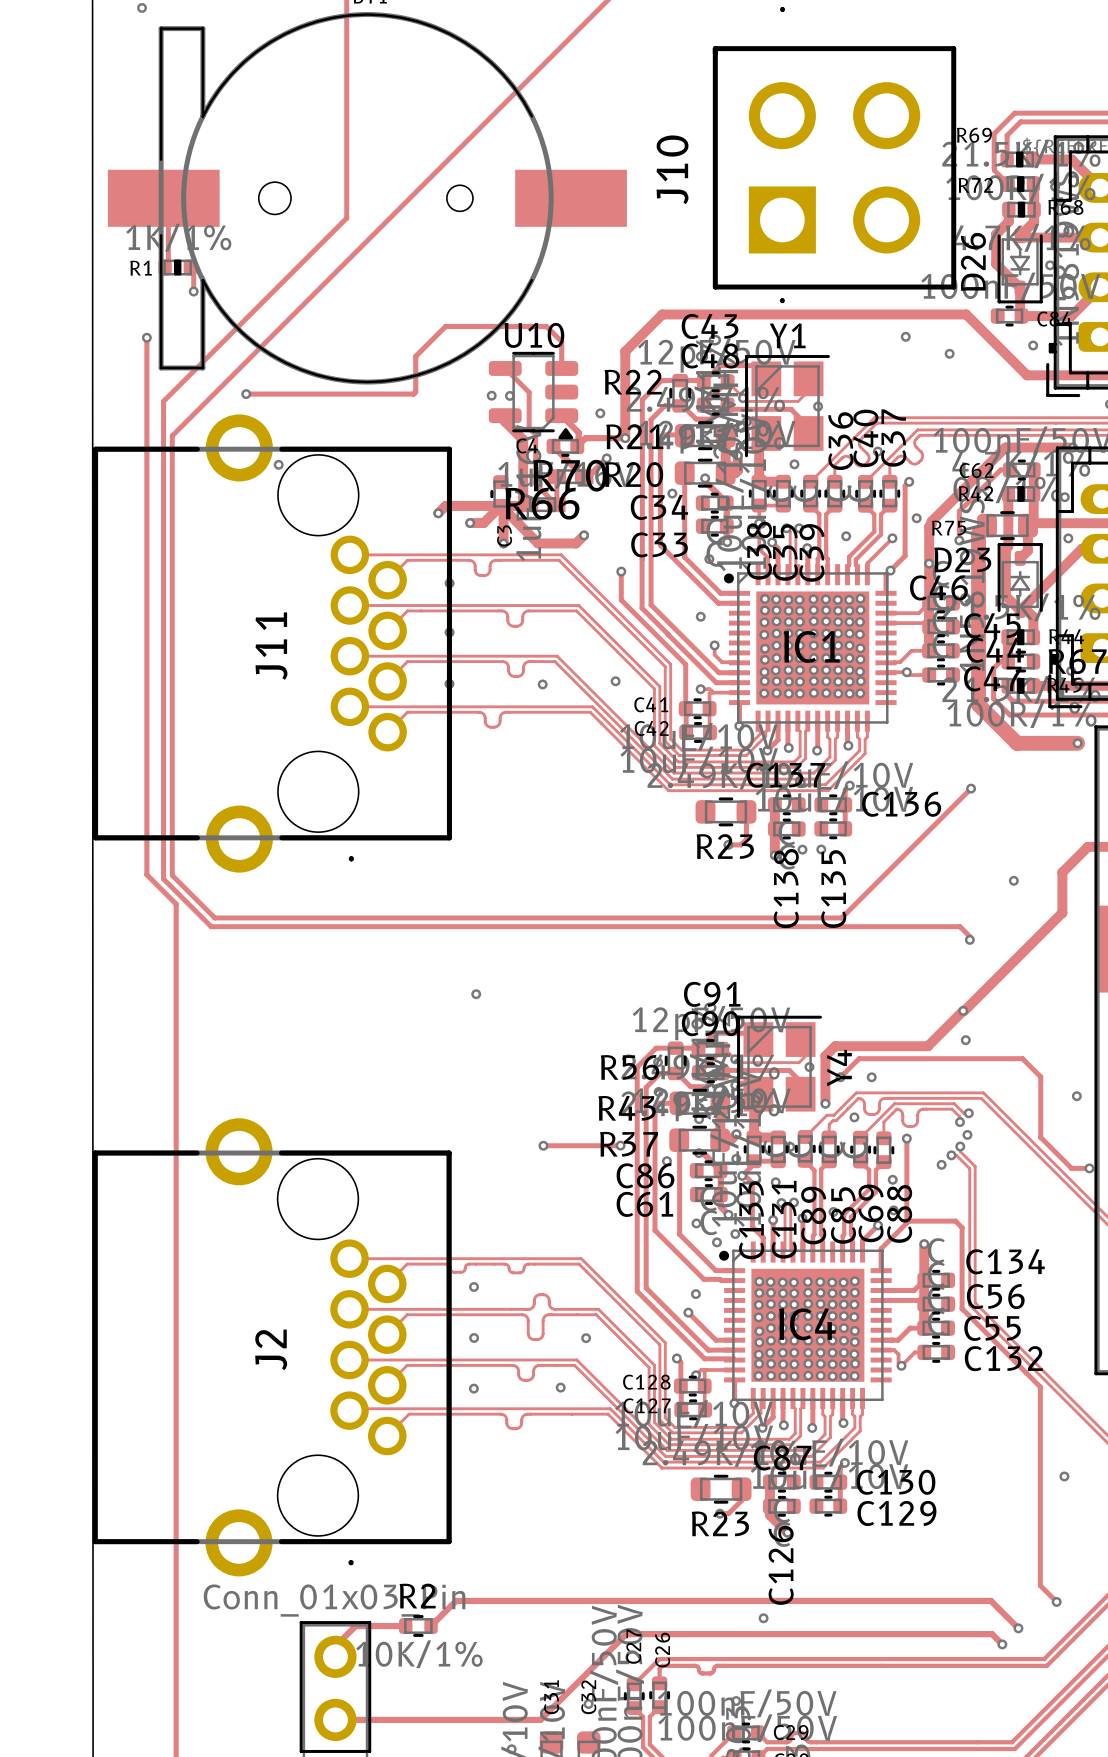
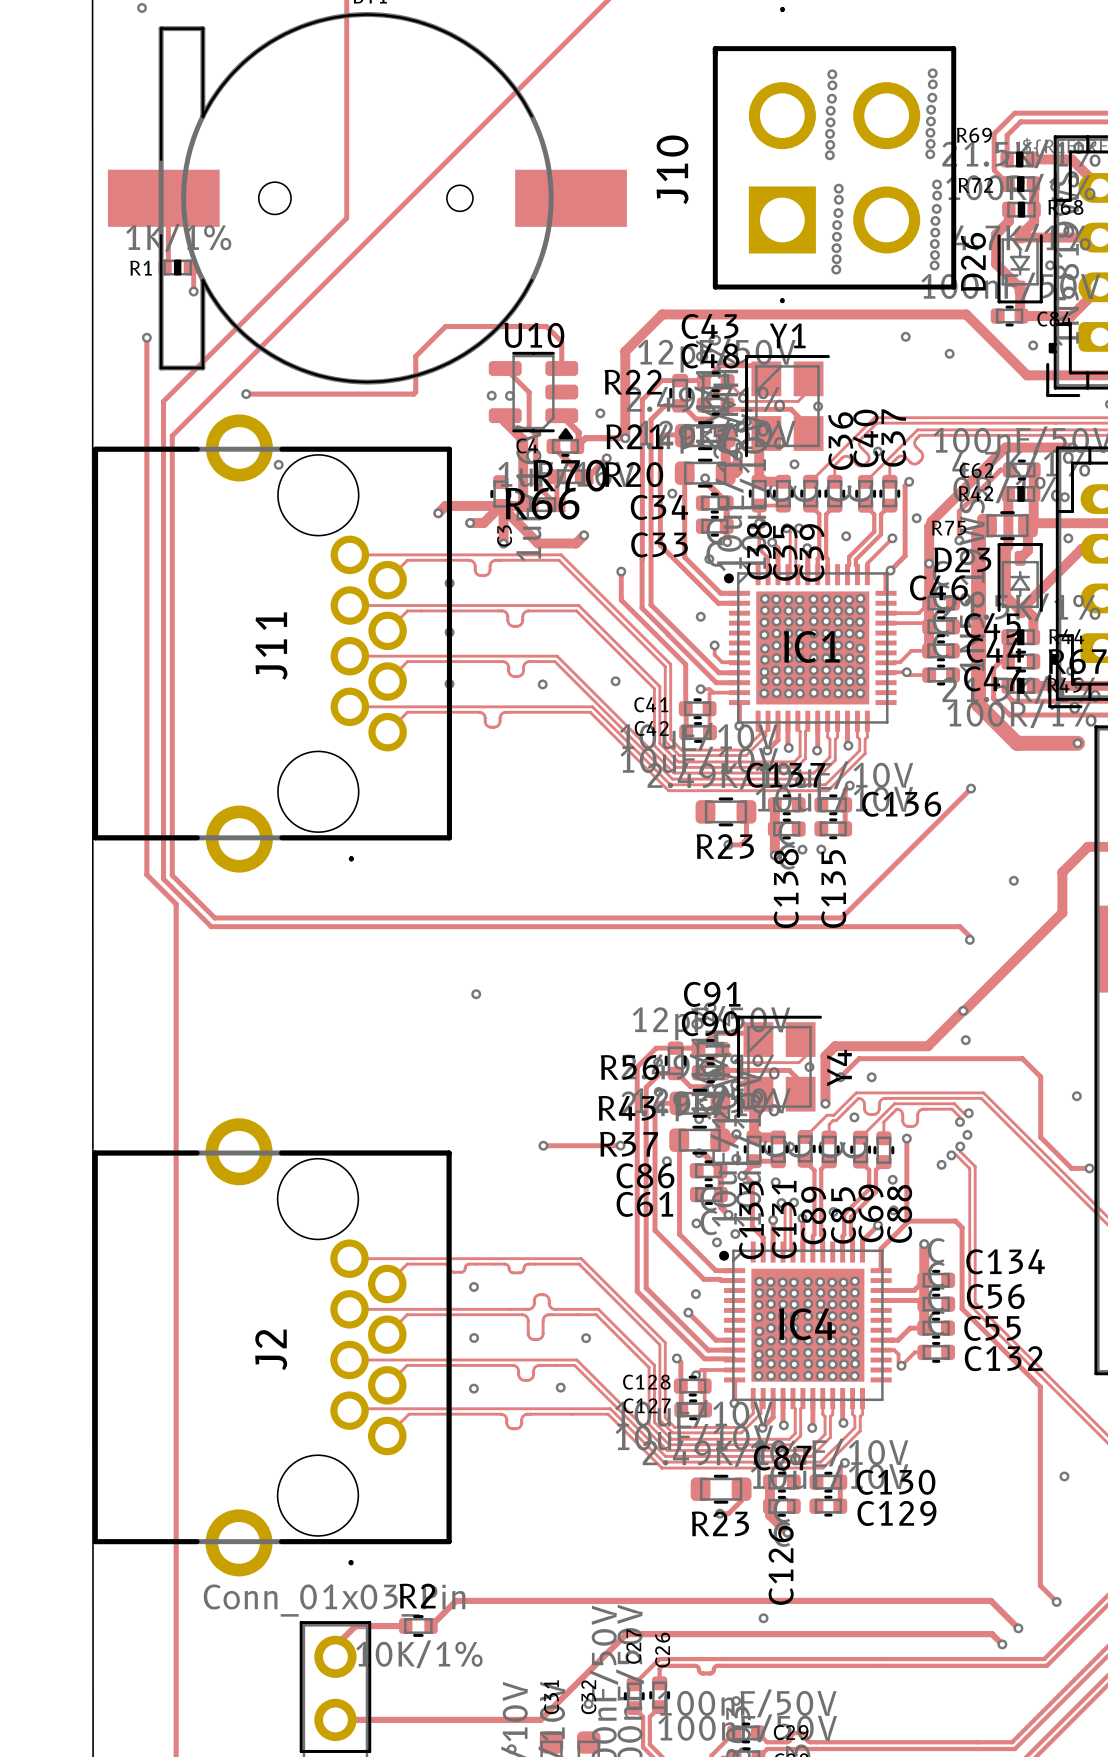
via: none -> (932, 73)
via: none -> (832, 74)
via: none -> (932, 84)
via: none -> (832, 85)
via: none -> (932, 97)
via: none -> (831, 98)
via: none -> (931, 109)
via: none -> (830, 110)
via: none -> (930, 121)
via: none -> (830, 122)
via: none -> (930, 132)
via: none -> (830, 133)
via: none -> (930, 143)
via: none -> (830, 144)
via: none -> (930, 154)
via: none -> (829, 155)
via: none -> (937, 184)
via: none -> (838, 188)
via: none -> (937, 195)
via: none -> (838, 199)
via: none -> (936, 208)
via: none -> (838, 213)
via: none -> (935, 220)
via: none -> (837, 225)
via: none -> (935, 232)
via: none -> (836, 236)
via: none -> (934, 244)
via: none -> (836, 248)
via: none -> (934, 255)
via: none -> (836, 259)
via: none -> (934, 265)
via: none -> (836, 269)

